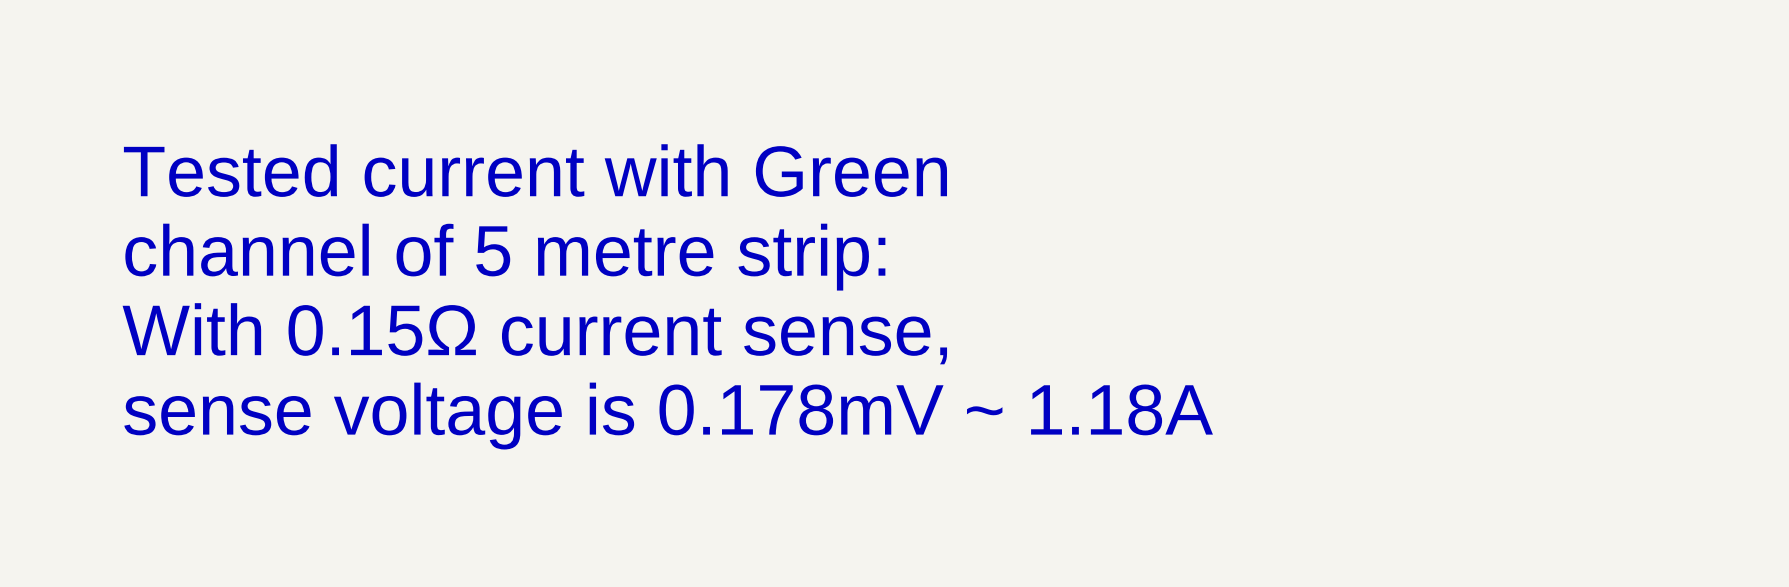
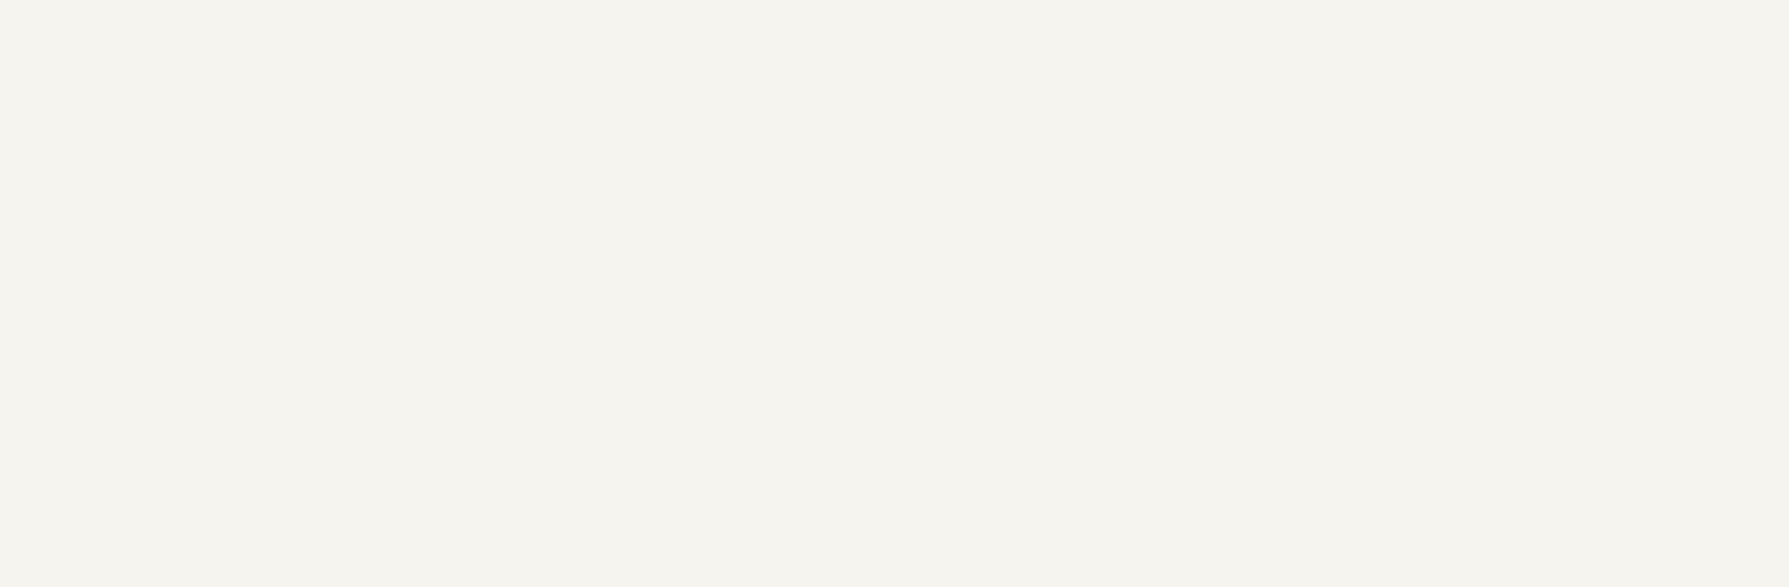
text: Tested current with Green (535, 170) -> none
text: channel of 5 metre strip: (505, 257) -> none
text: With 0.15Ω current sense, (534, 333) -> none
text: sense voltage is 0.178mV ~ 1.18A (668, 416) -> none

